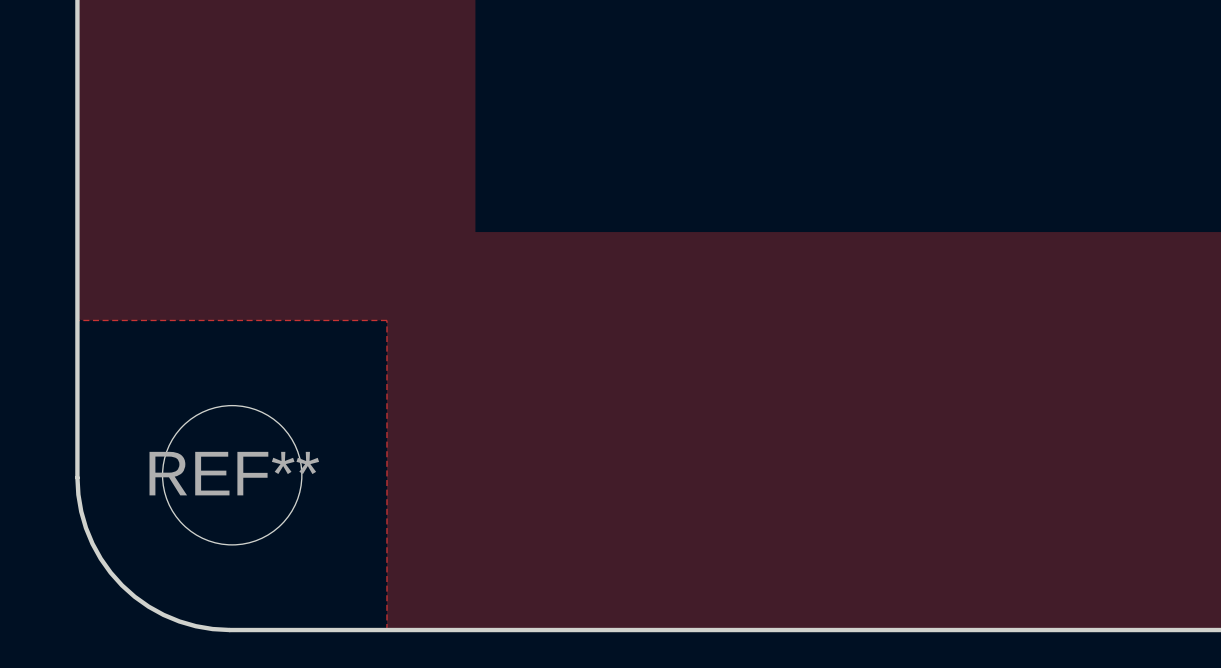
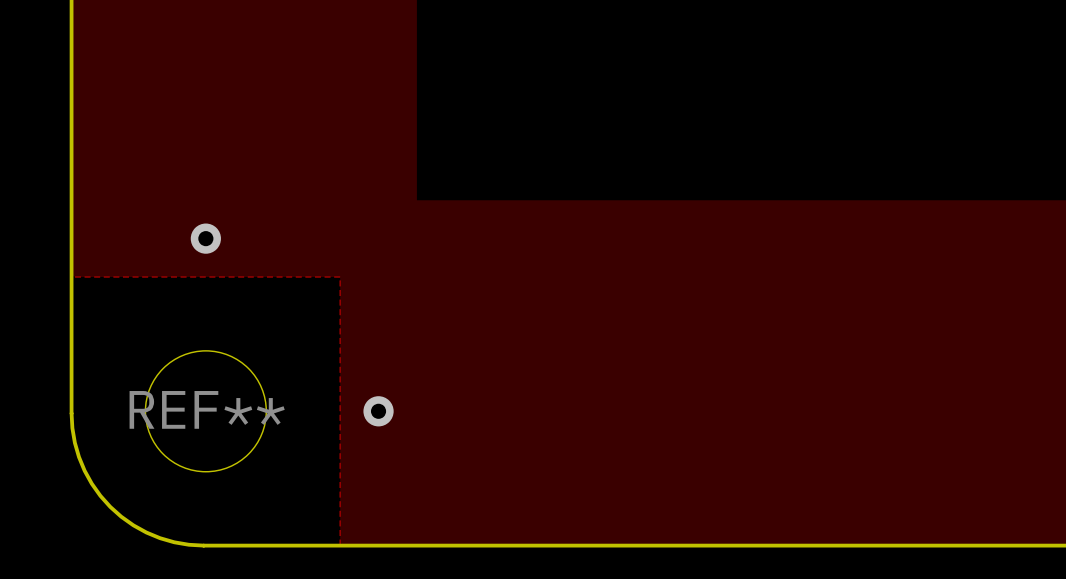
via: none -> (205, 238)
via: none -> (378, 411)

